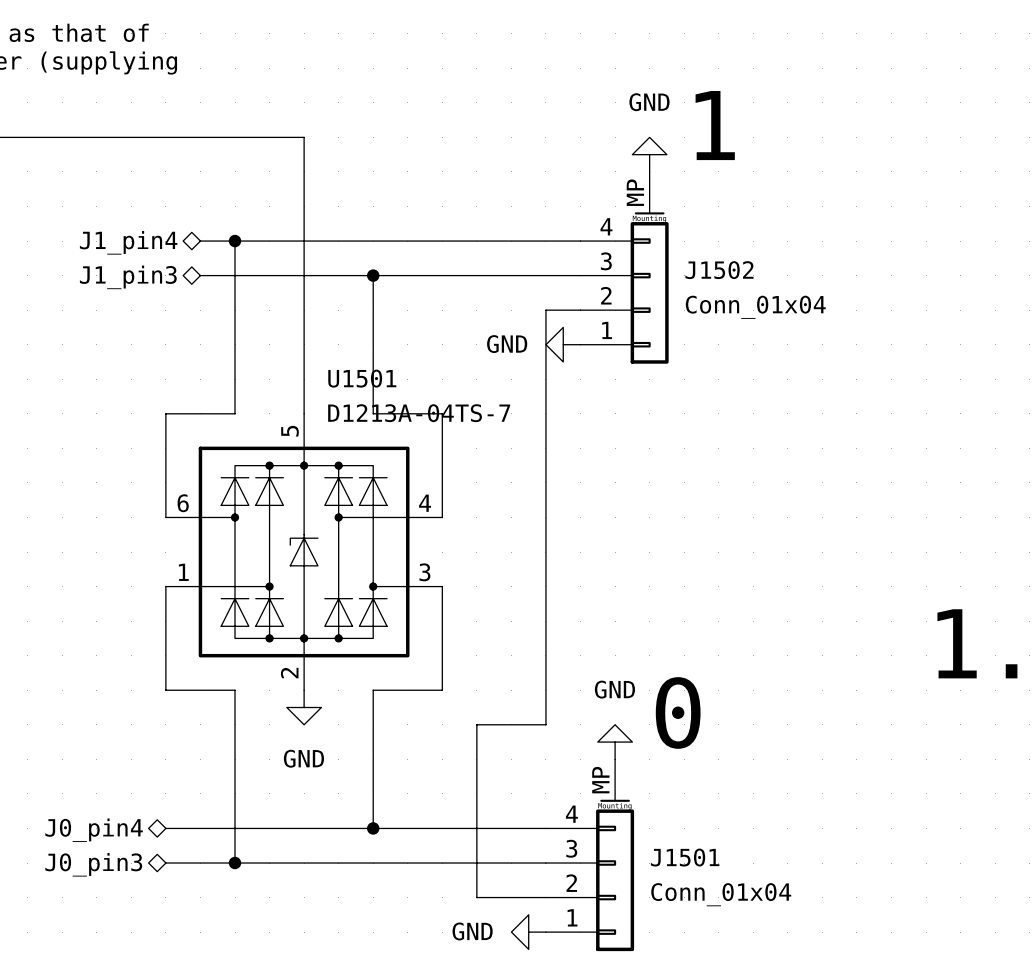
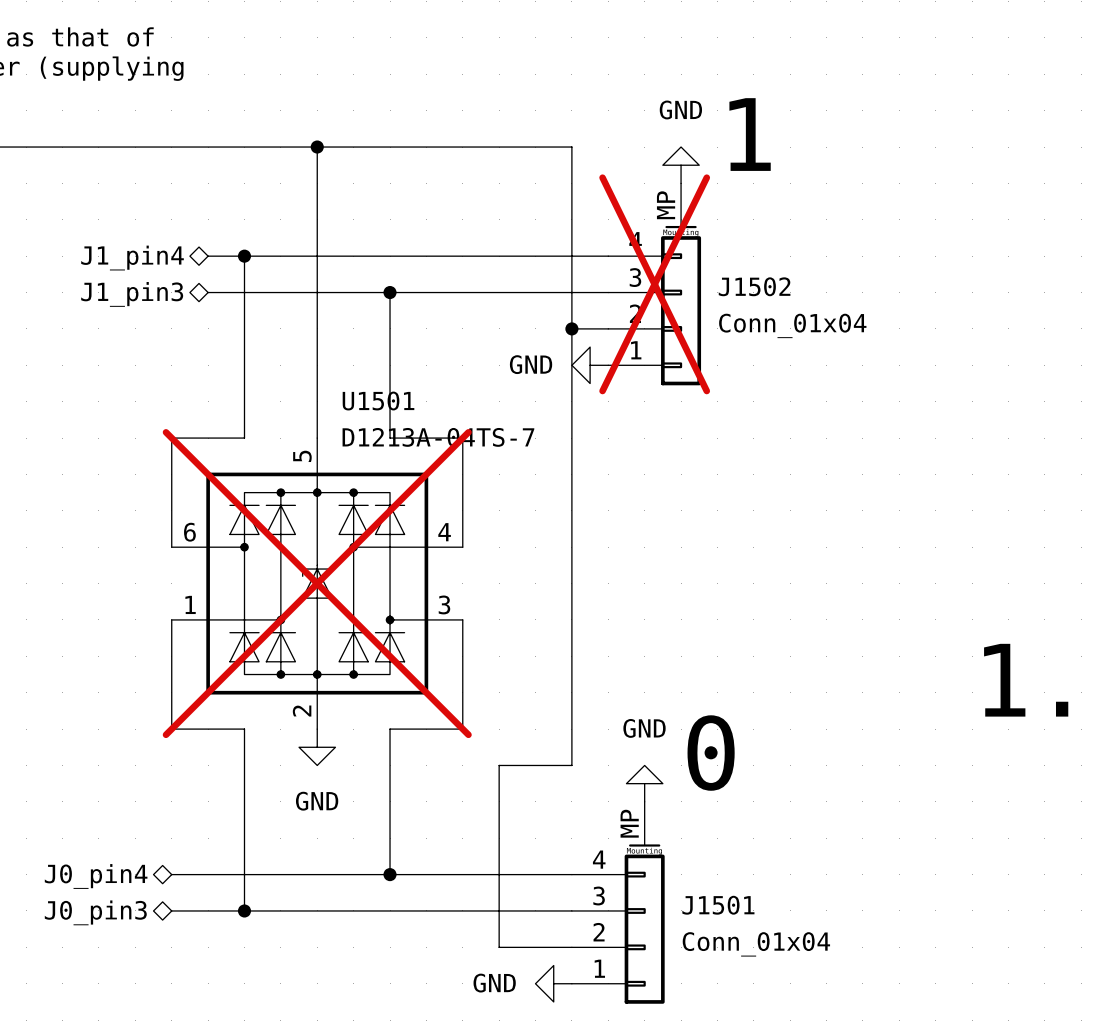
wire: none -> (317, 147) (571, 147) (571, 328)
junction: none -> (317, 147)
J1502 do-not-place cross: none -> (654, 284)
junction: none -> (571, 328)
U1501 do-not-place cross: none -> (317, 583)

